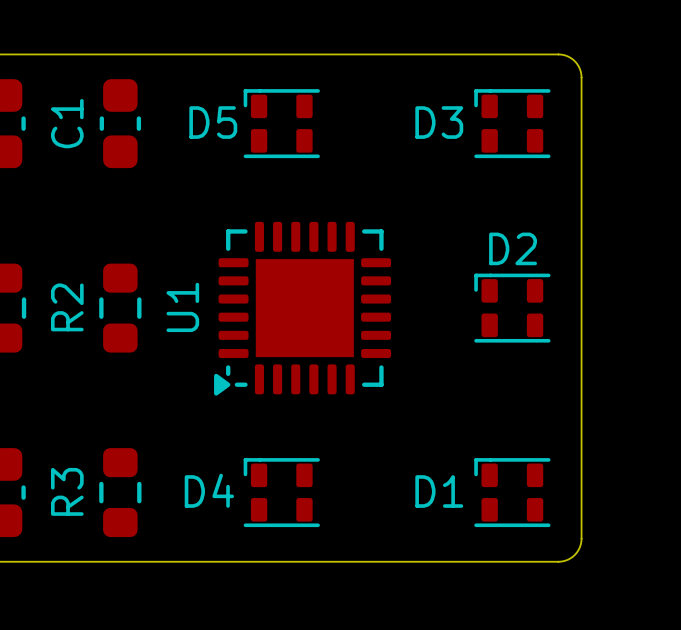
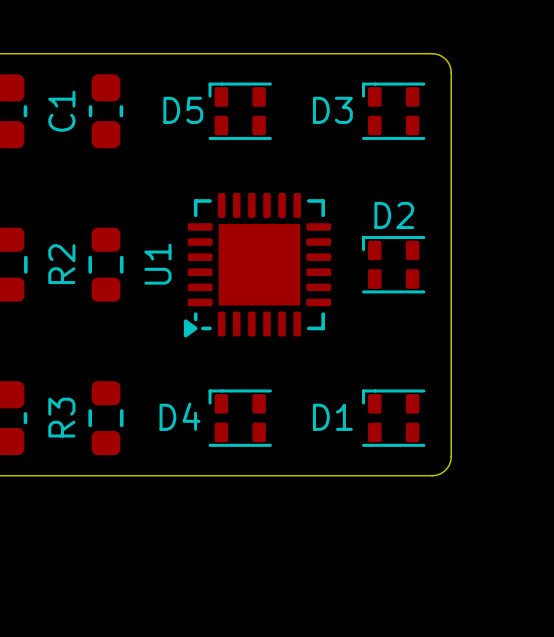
board edge: (512, 54) (566, 55) (576, 63) (581, 77) (581, 541) (576, 553) (566, 560) (512, 561) -> (432, 53) (445, 59) (451, 72) (451, 456) (445, 470) (432, 475)
D3 position: (512, 123) -> (393, 111)
D2 position: (512, 308) -> (393, 264)
D1 position: (512, 492) -> (393, 418)

